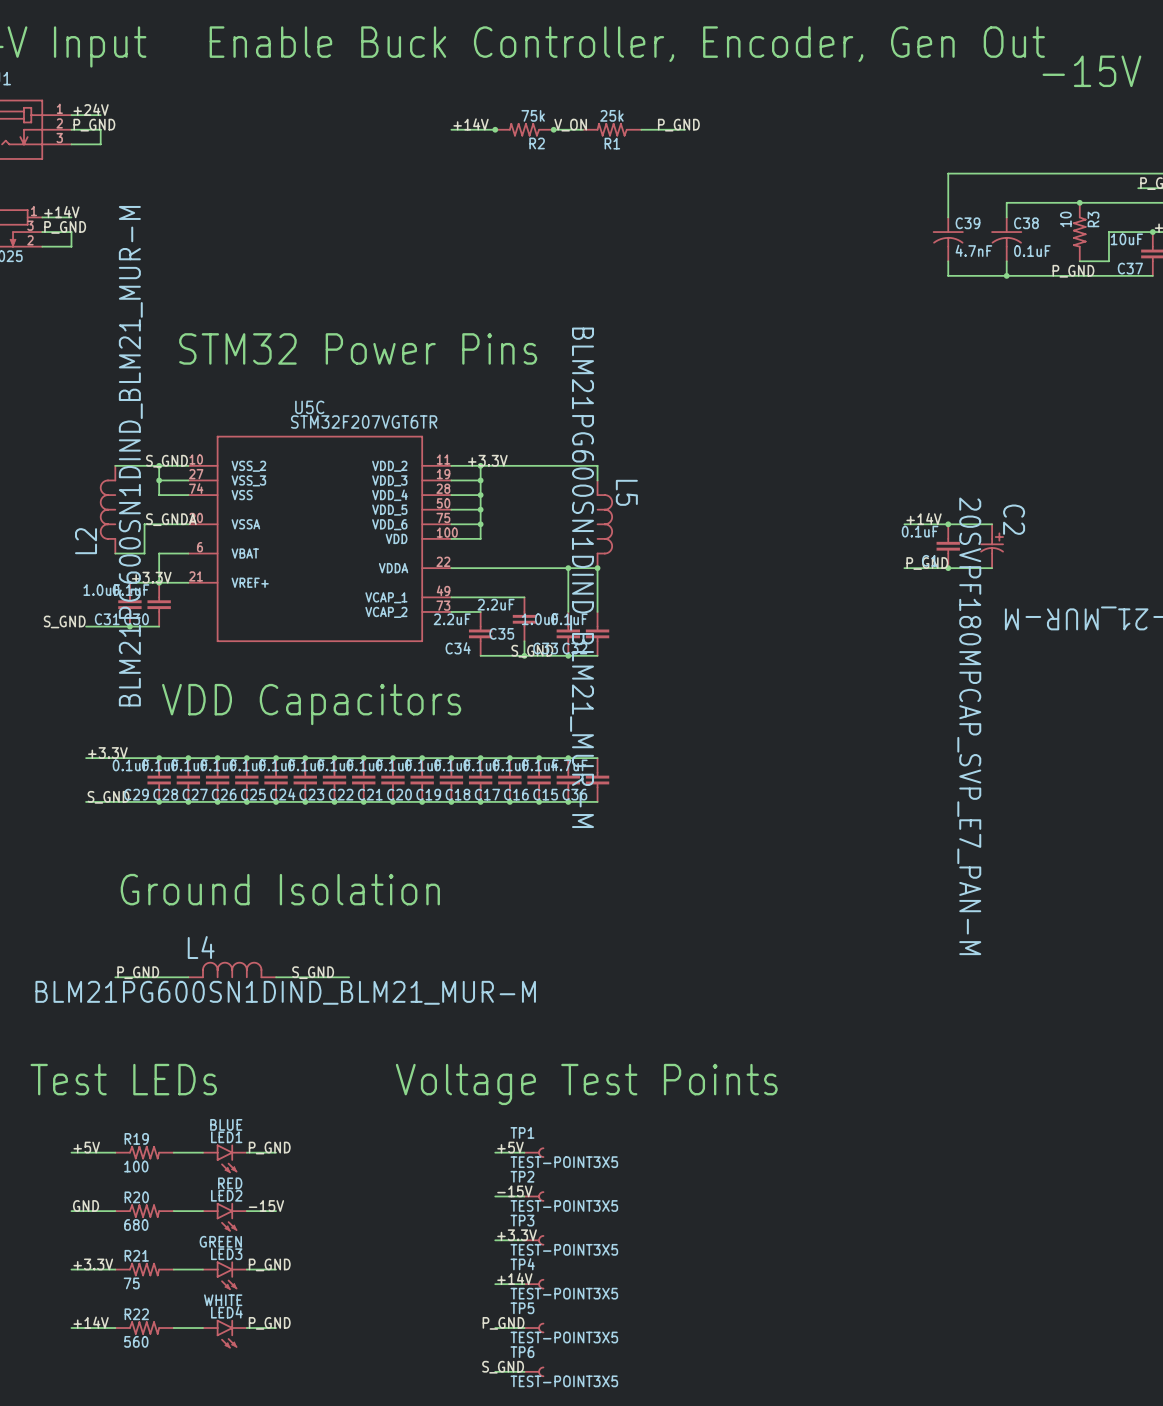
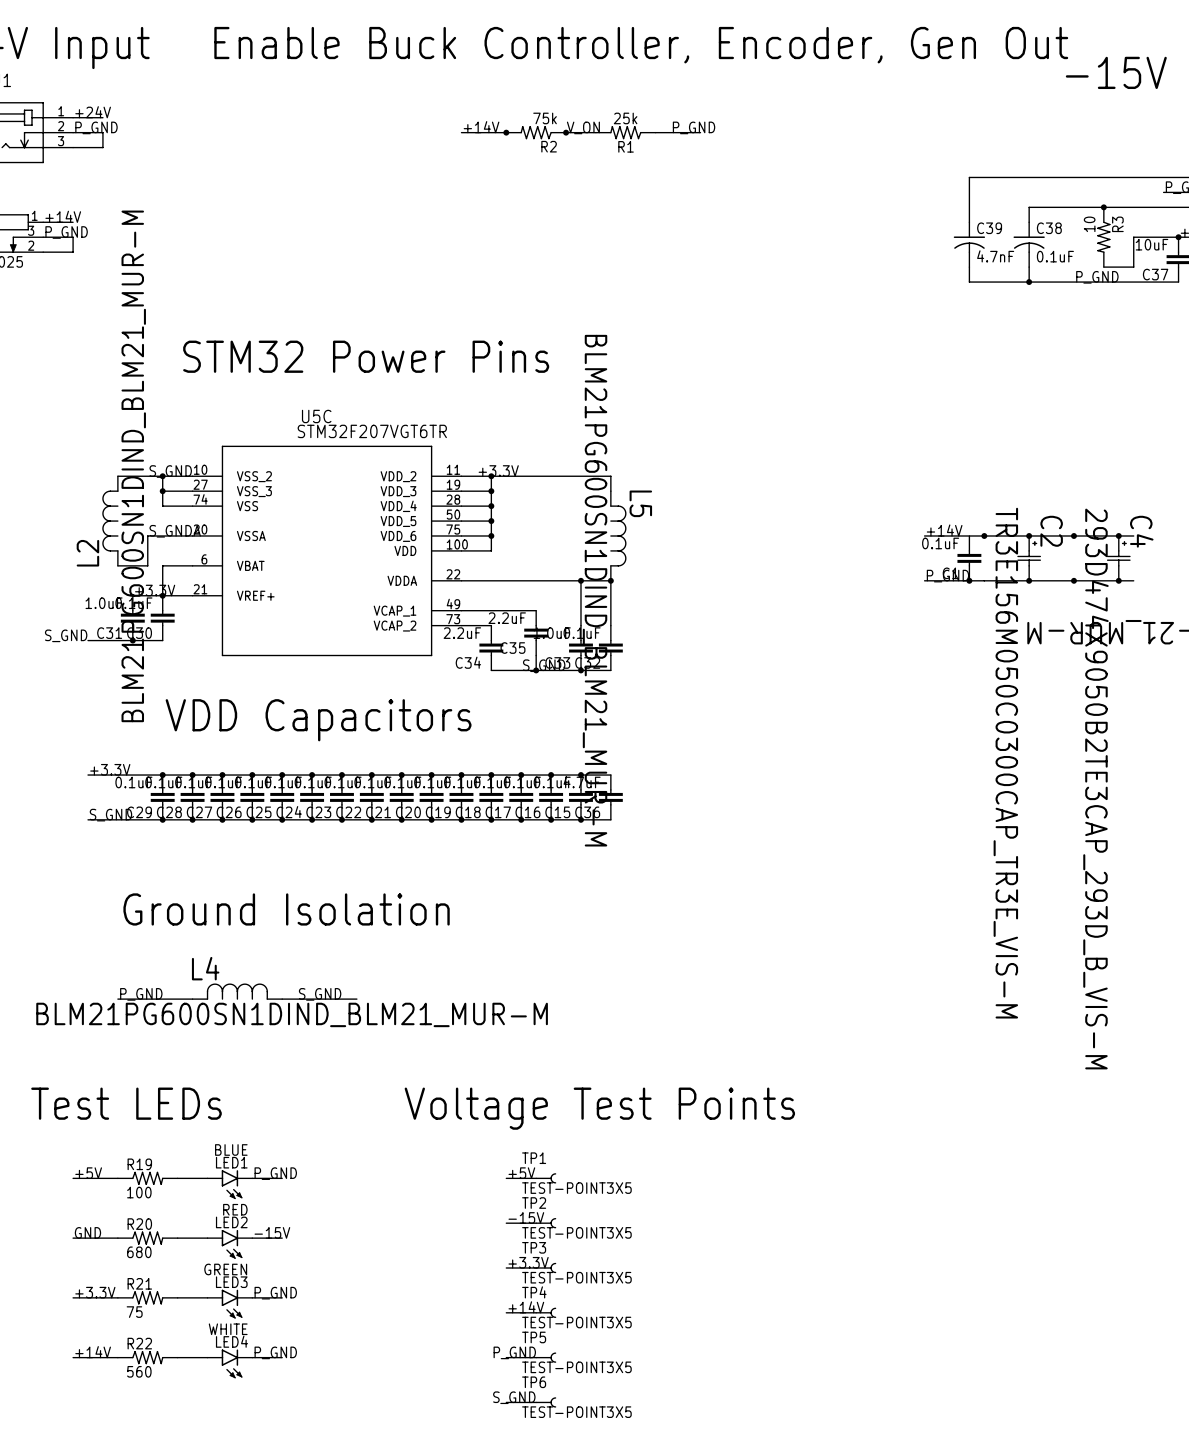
junction position: (948, 524) -> (984, 535)
C2 symbol: [980, 524, 1004, 569] -> [1017, 535, 1041, 581]
wire: none -> (1014, 535) (1133, 535)
junction: none -> (1029, 535)
junction: none -> (1073, 535)
junction: none -> (1118, 535)
C4: none -> 293D474X9050B2TE3CAP_293D_B_VIS-M (1118, 558)
wire: none -> (1014, 580) (1133, 580)
junction: none -> (1029, 580)
junction: none -> (1073, 580)
junction: none -> (1118, 580)
C2 value: 20SVPF180MPCAP_SVP_E7_PAN-M (969, 726) -> TR3E156M050C0300CAP_TR3E_VIS-M (1005, 763)

